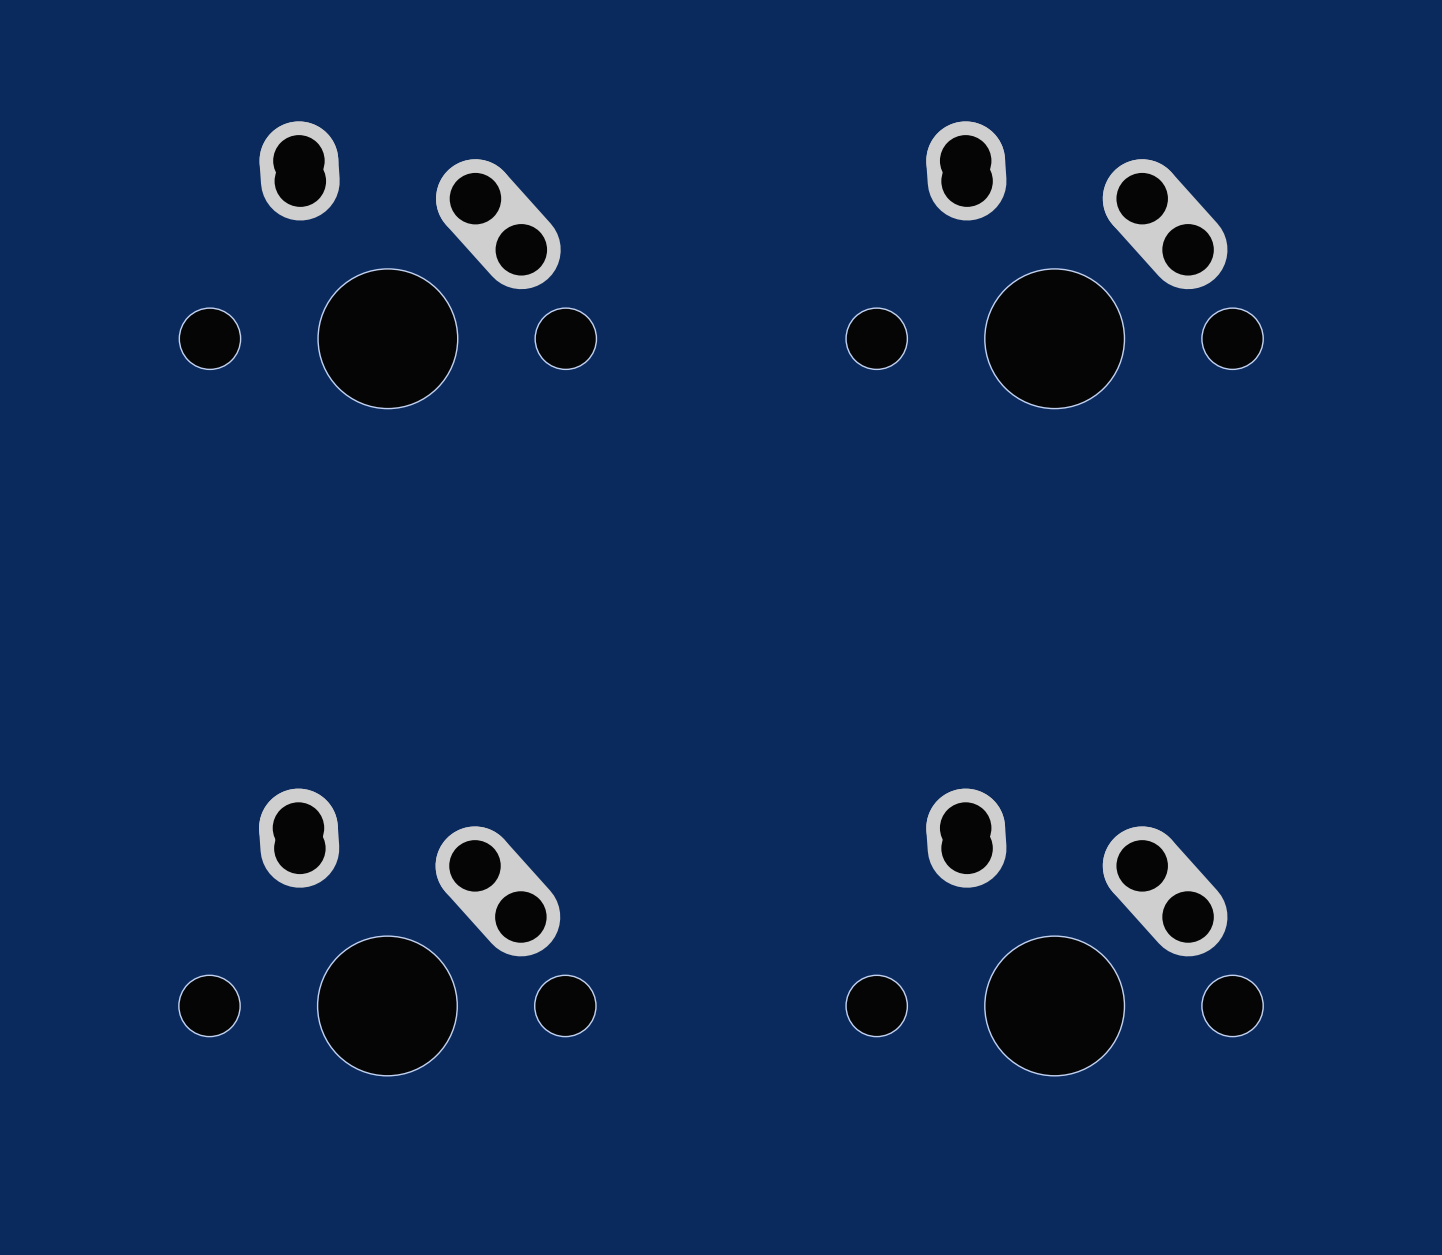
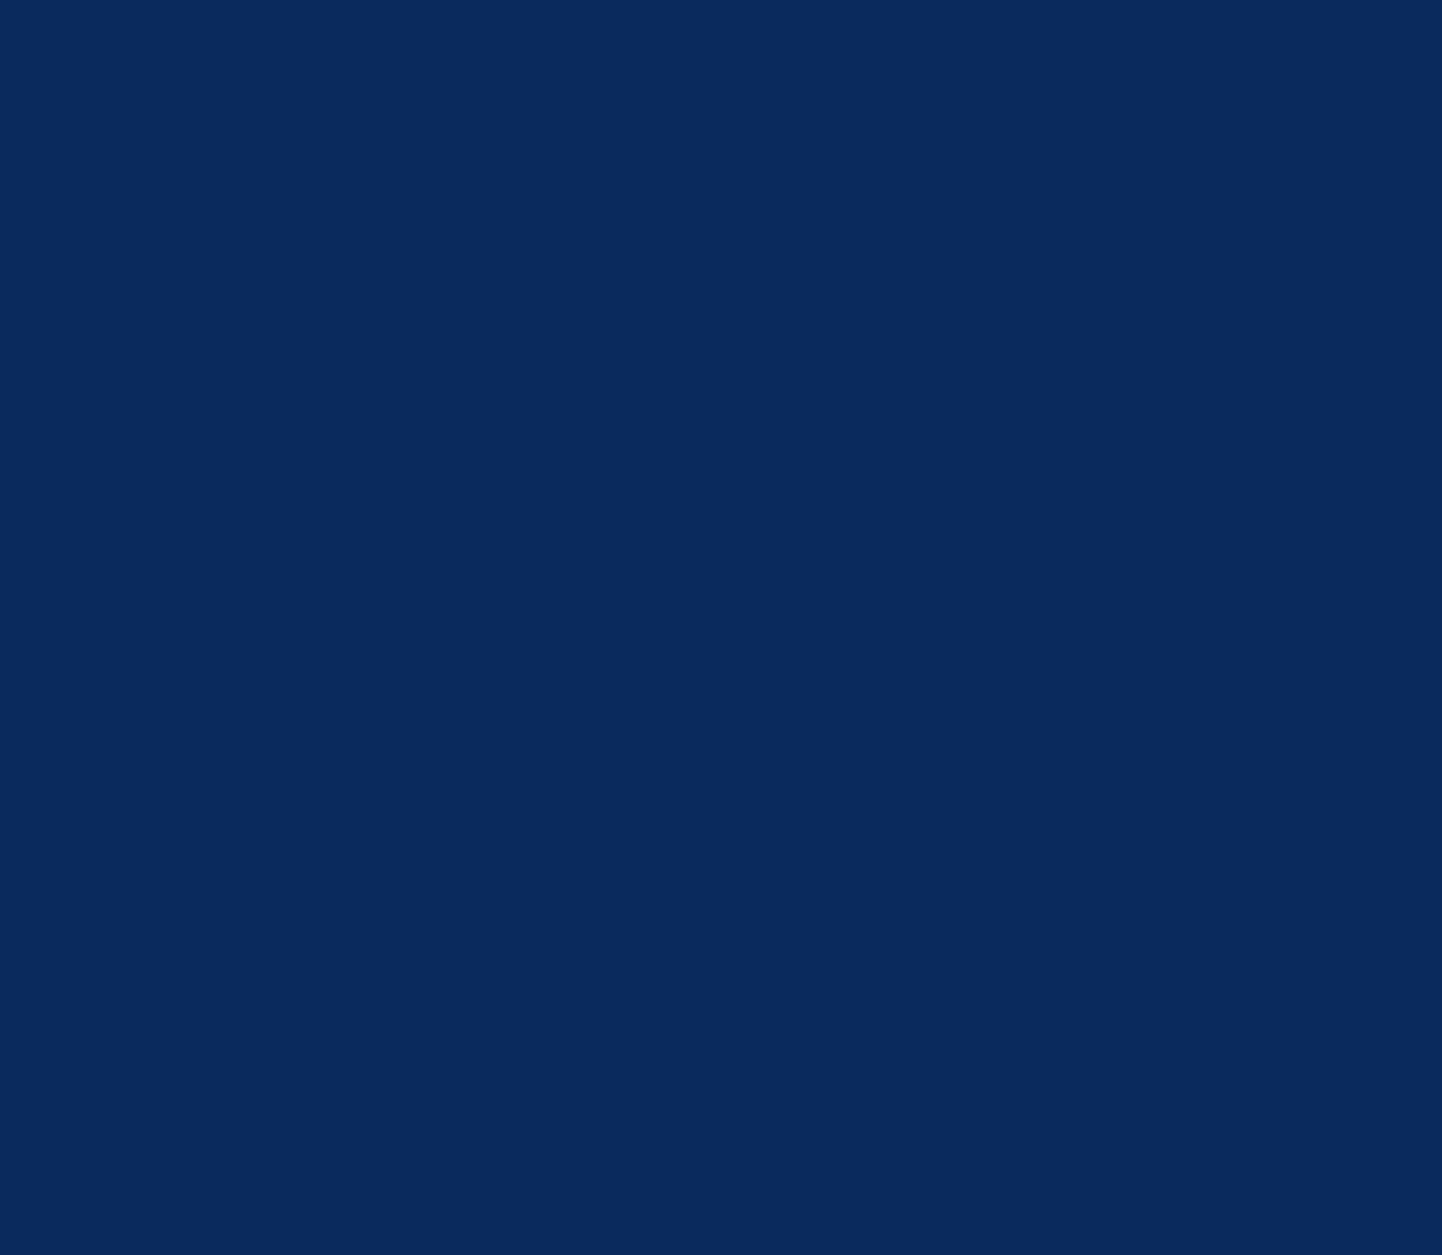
part: (387, 265) -> none
part: (1054, 265) -> none
part: (387, 932) -> none
part: (1054, 932) -> none

